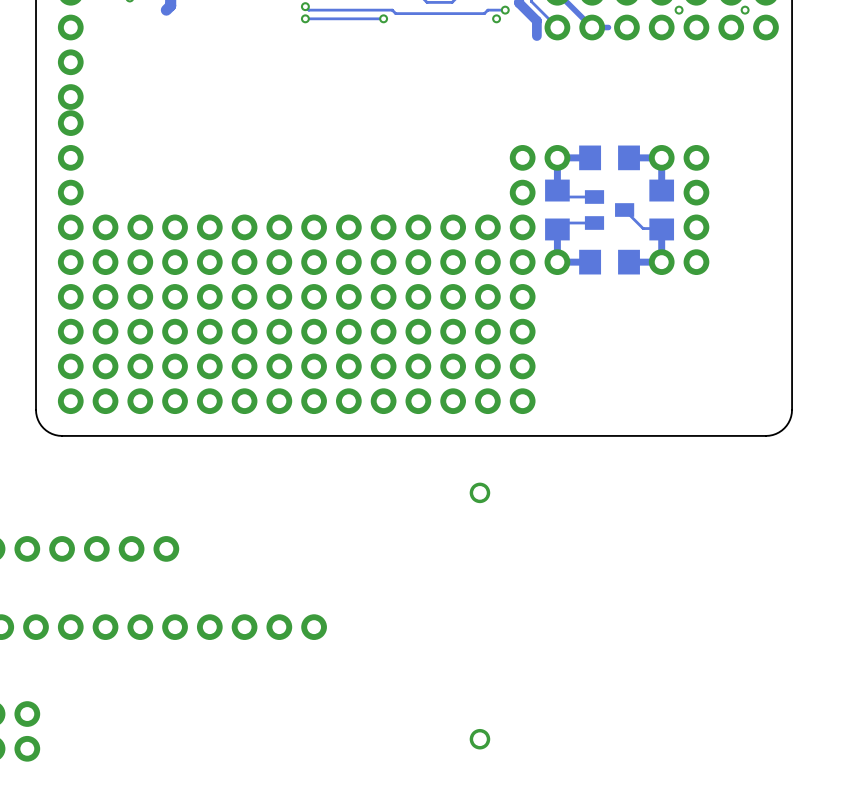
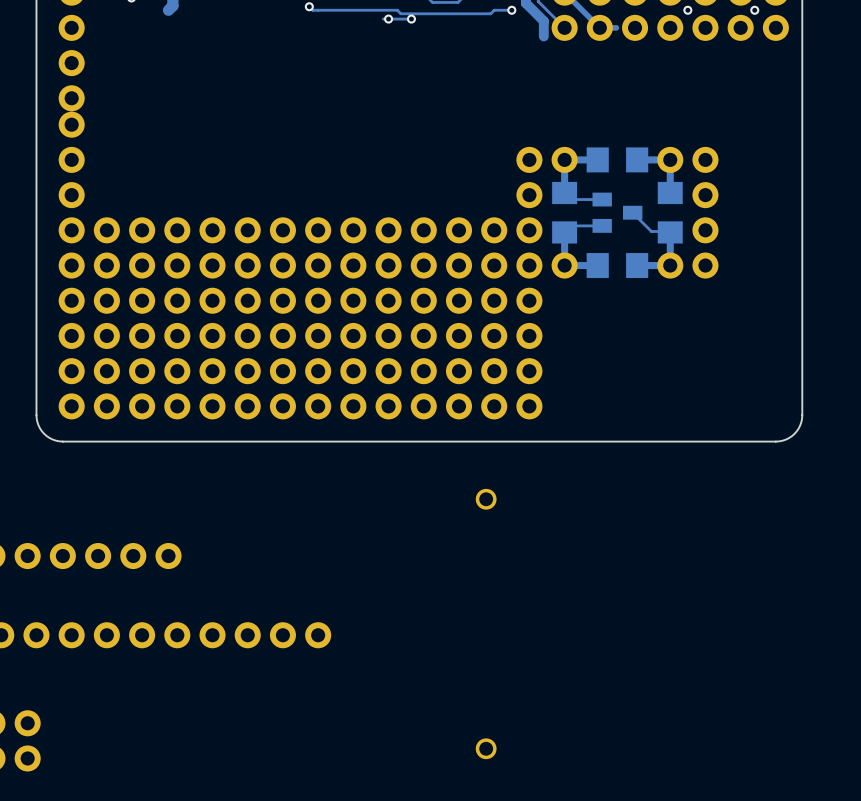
via: (305, 18) -> none
track: (378, 18) (305, 18) -> none
track: none -> (411, 19) (388, 19)
via: none -> (411, 19)
via: (496, 18) -> none

